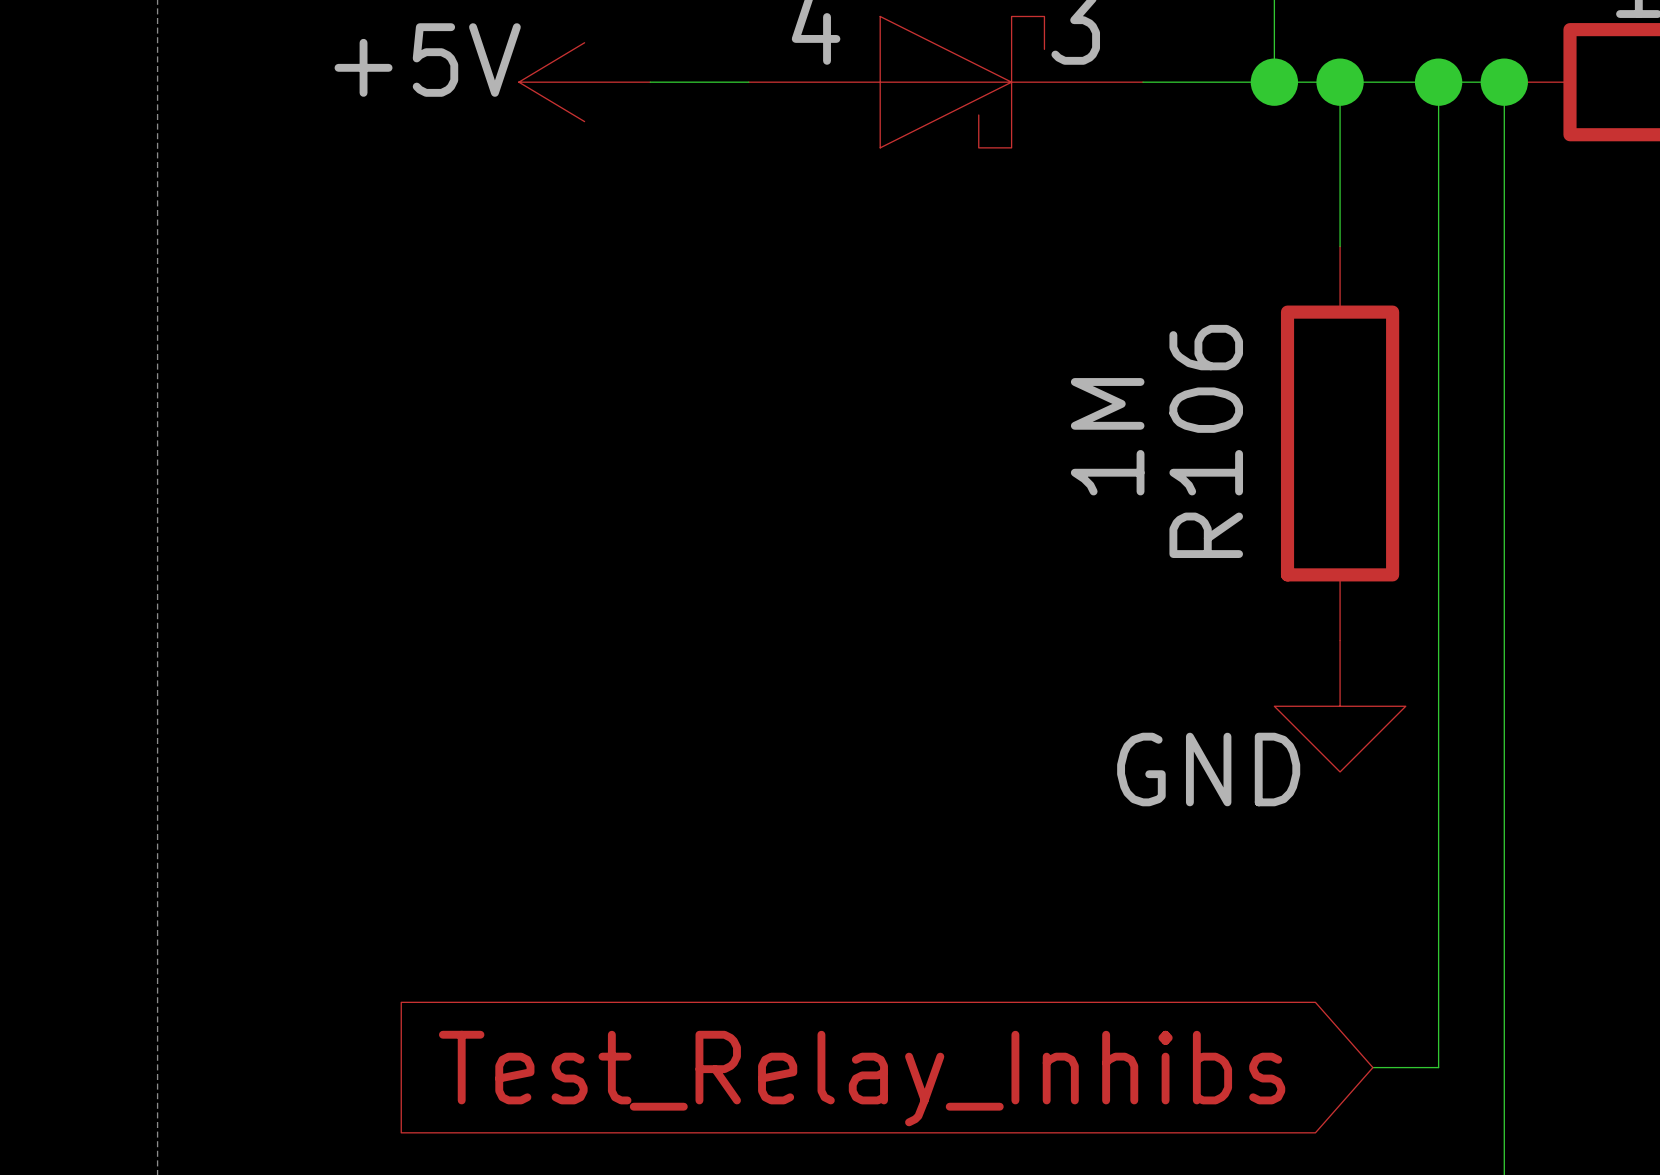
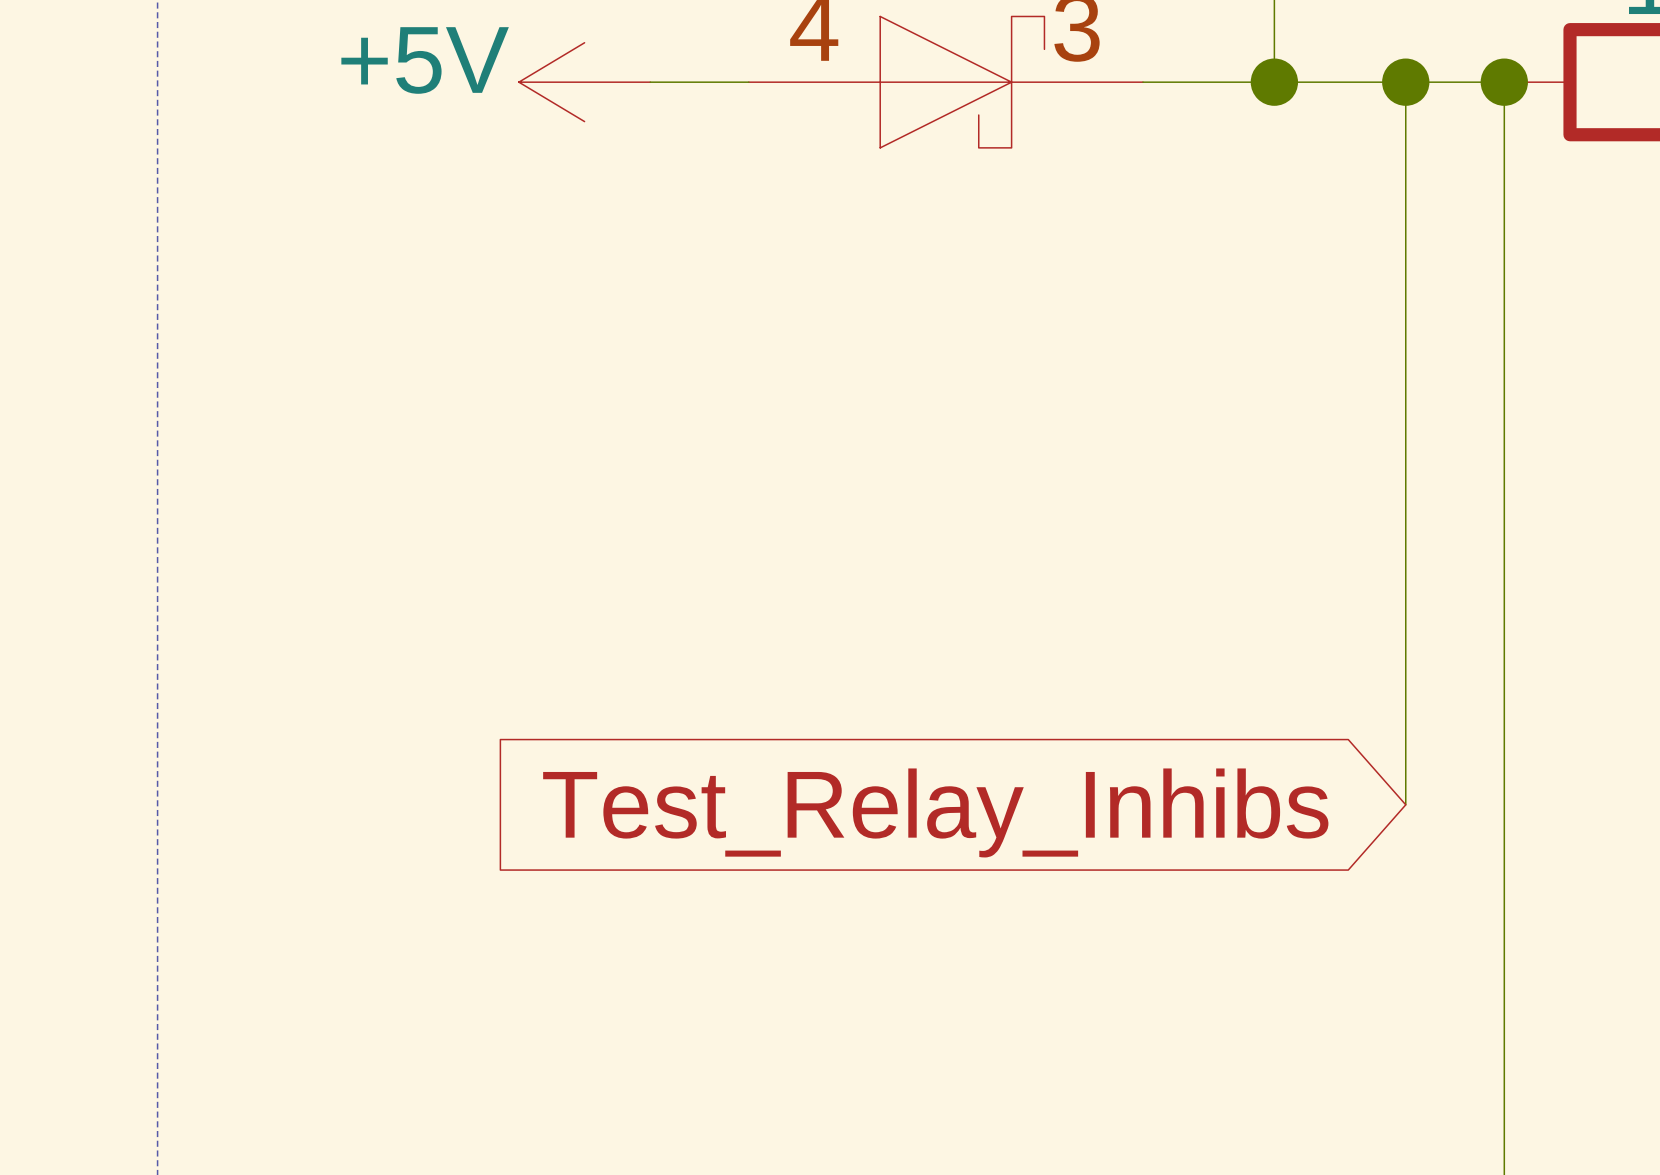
wire: (1340, 82) (1340, 246) -> none
junction: (1340, 82) -> none
wire: none -> (1405, 82) (1405, 804)
wire: (1438, 82) (1438, 1067) (1372, 1067) -> none
junction position: (1438, 82) -> (1405, 82)
R106: 1M (1340, 443) -> none
power symbol: GND (1340, 706) -> none
global label position: Test_Relay_Inhibs (862, 1078) -> Test_Relay_Inhibs (935, 812)

